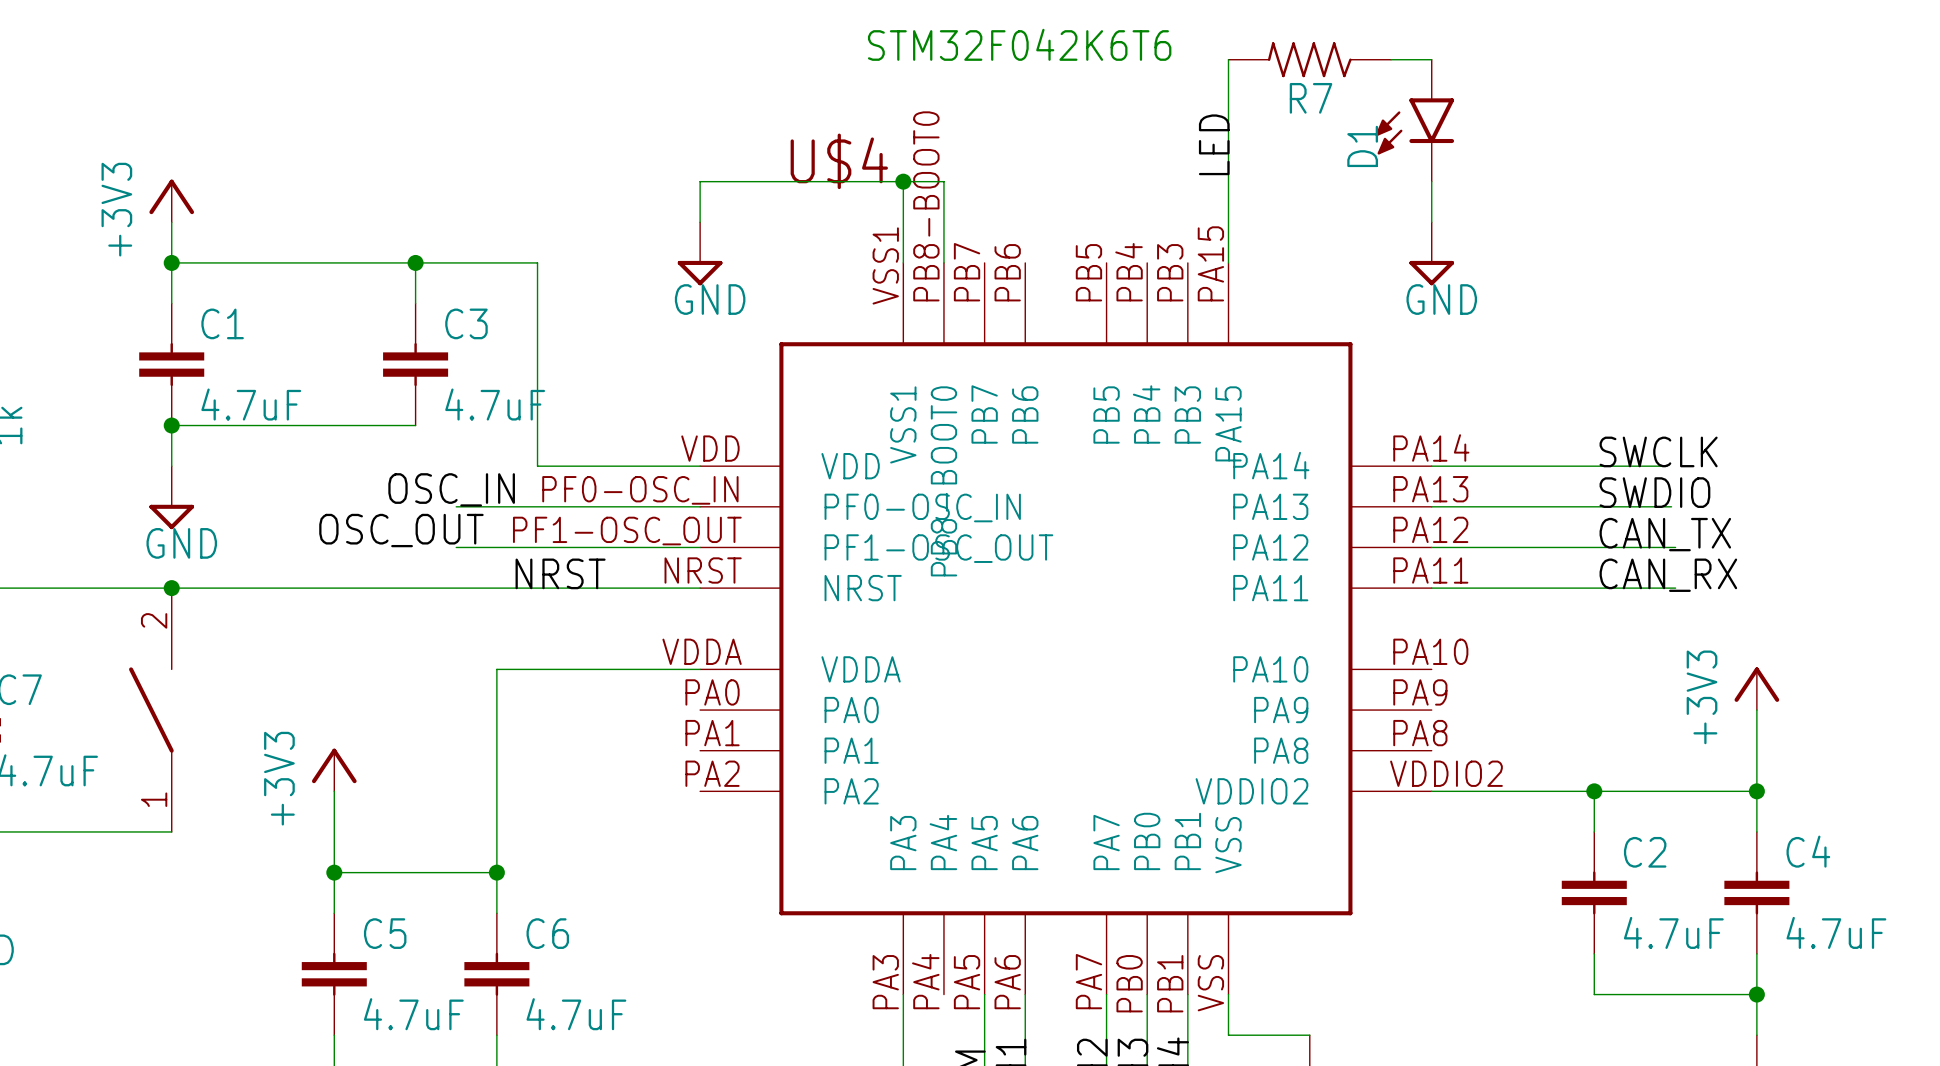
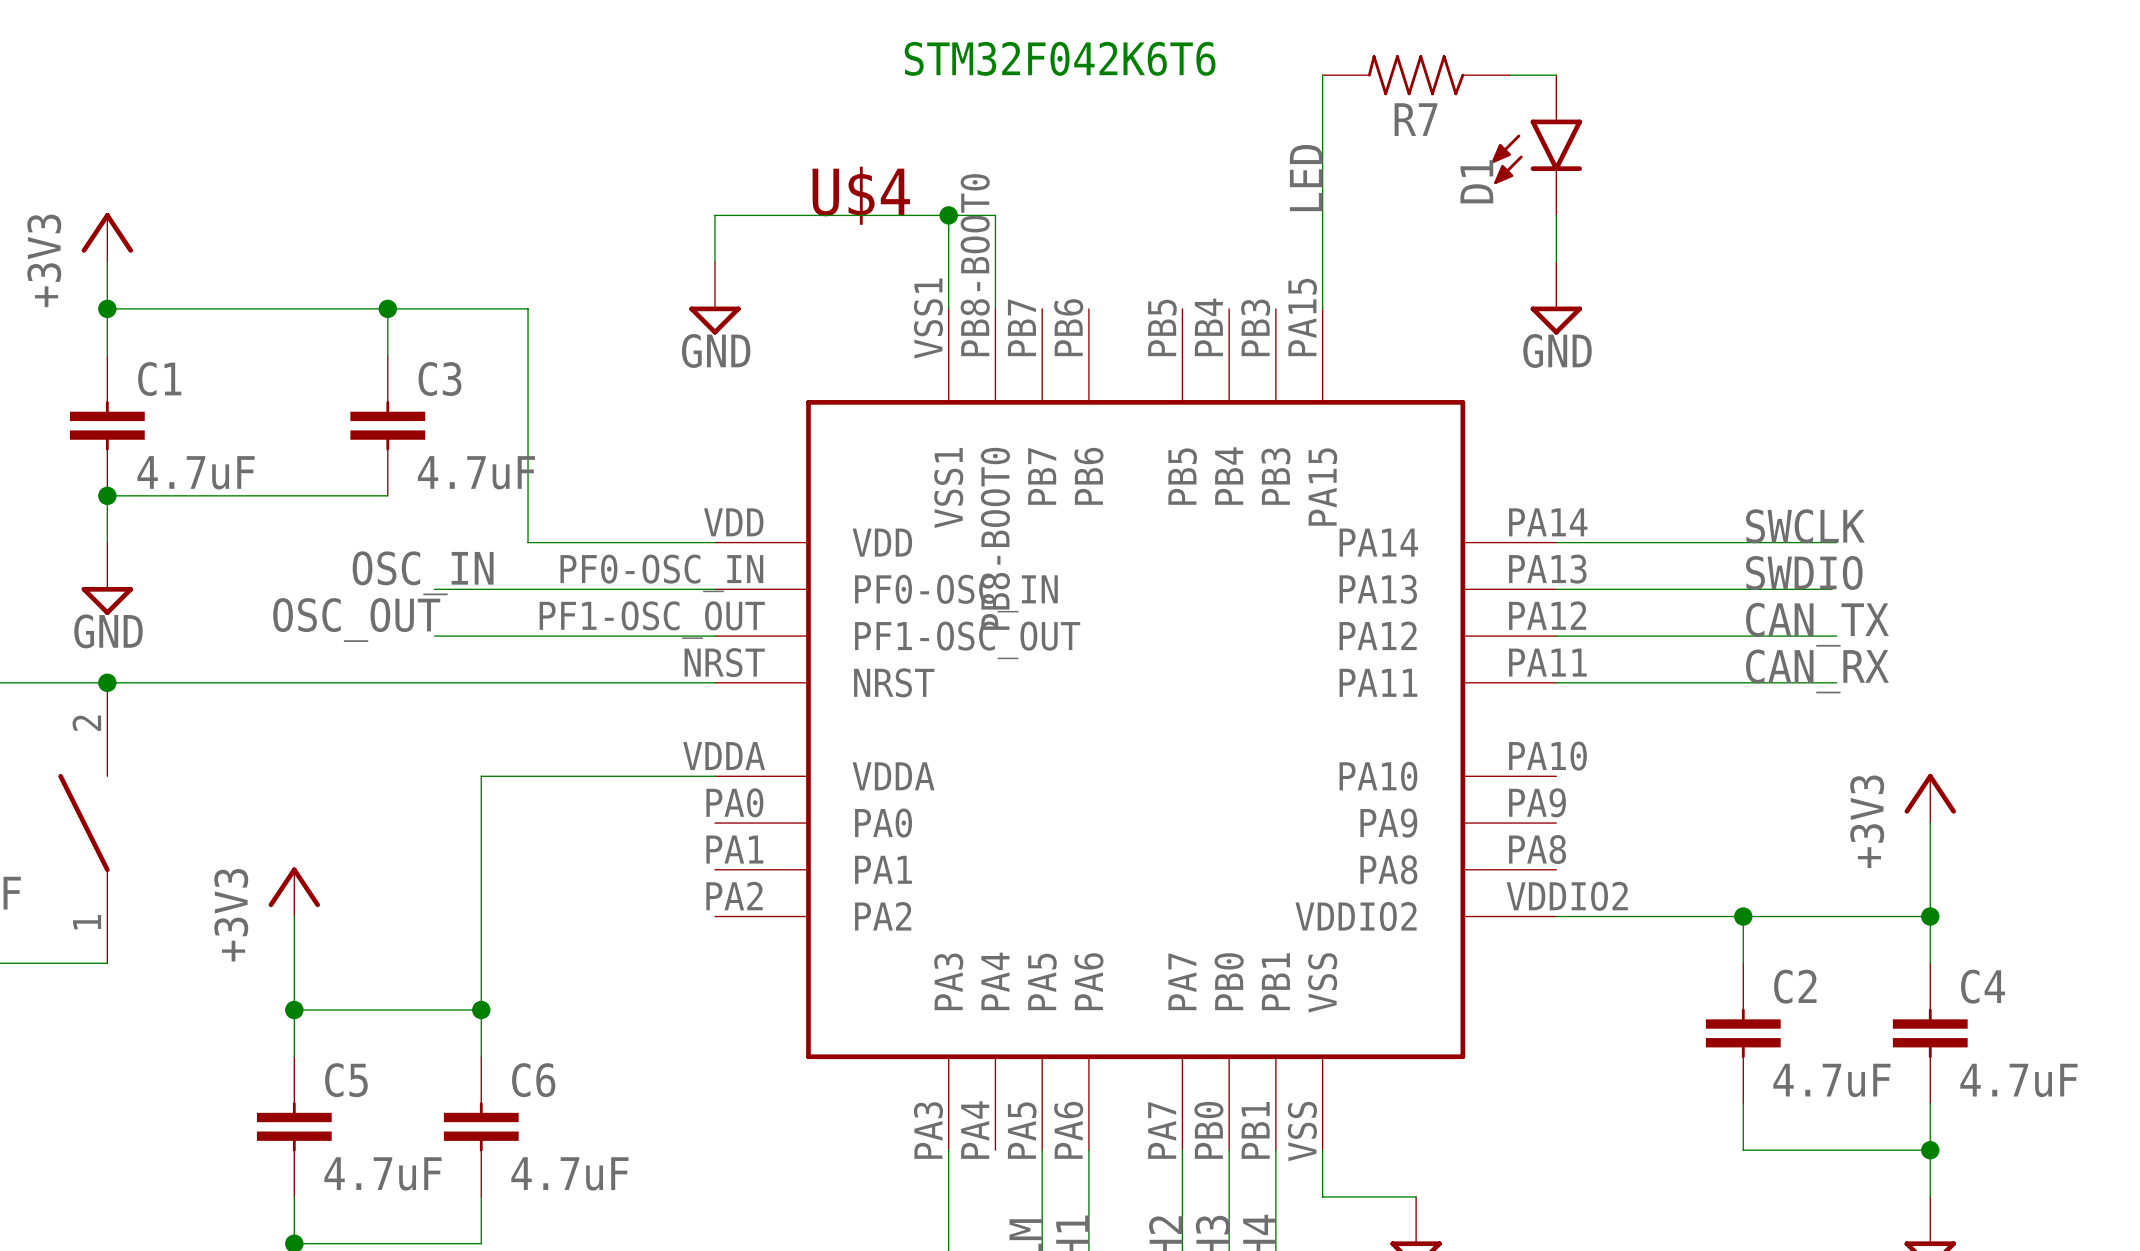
wire: none -> (1827, 542) (1836, 542)
label: NRST (560, 573) -> none

